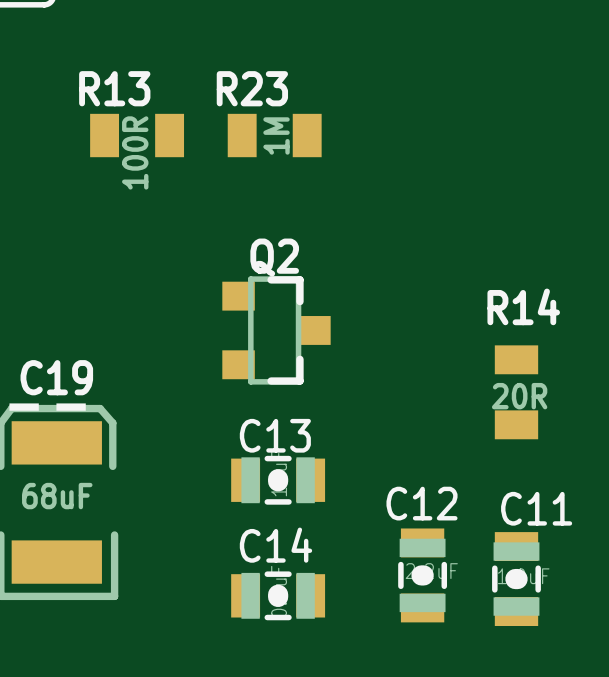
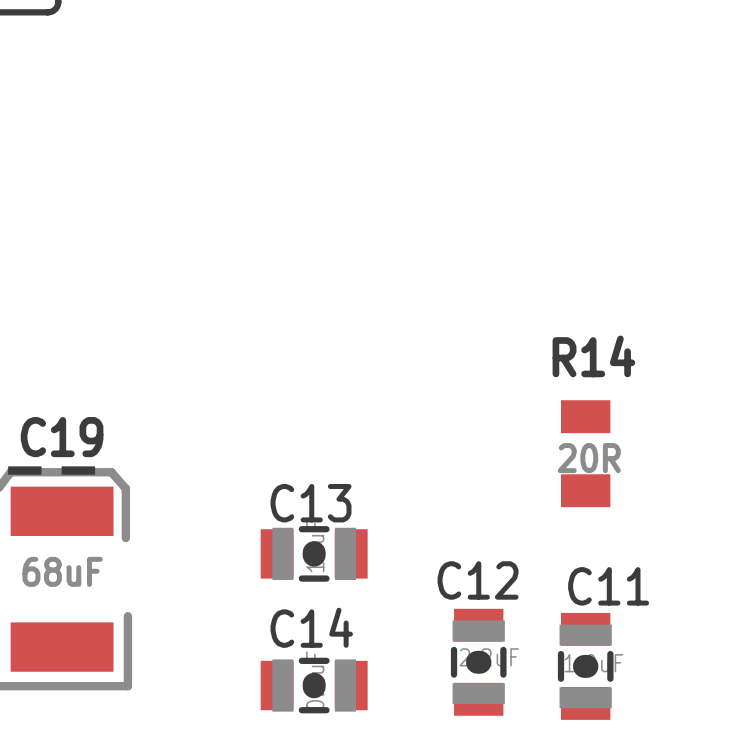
R13: 100R (137, 135) -> none
R23: 1M (274, 135) -> none
Q2: (276, 330) -> none

